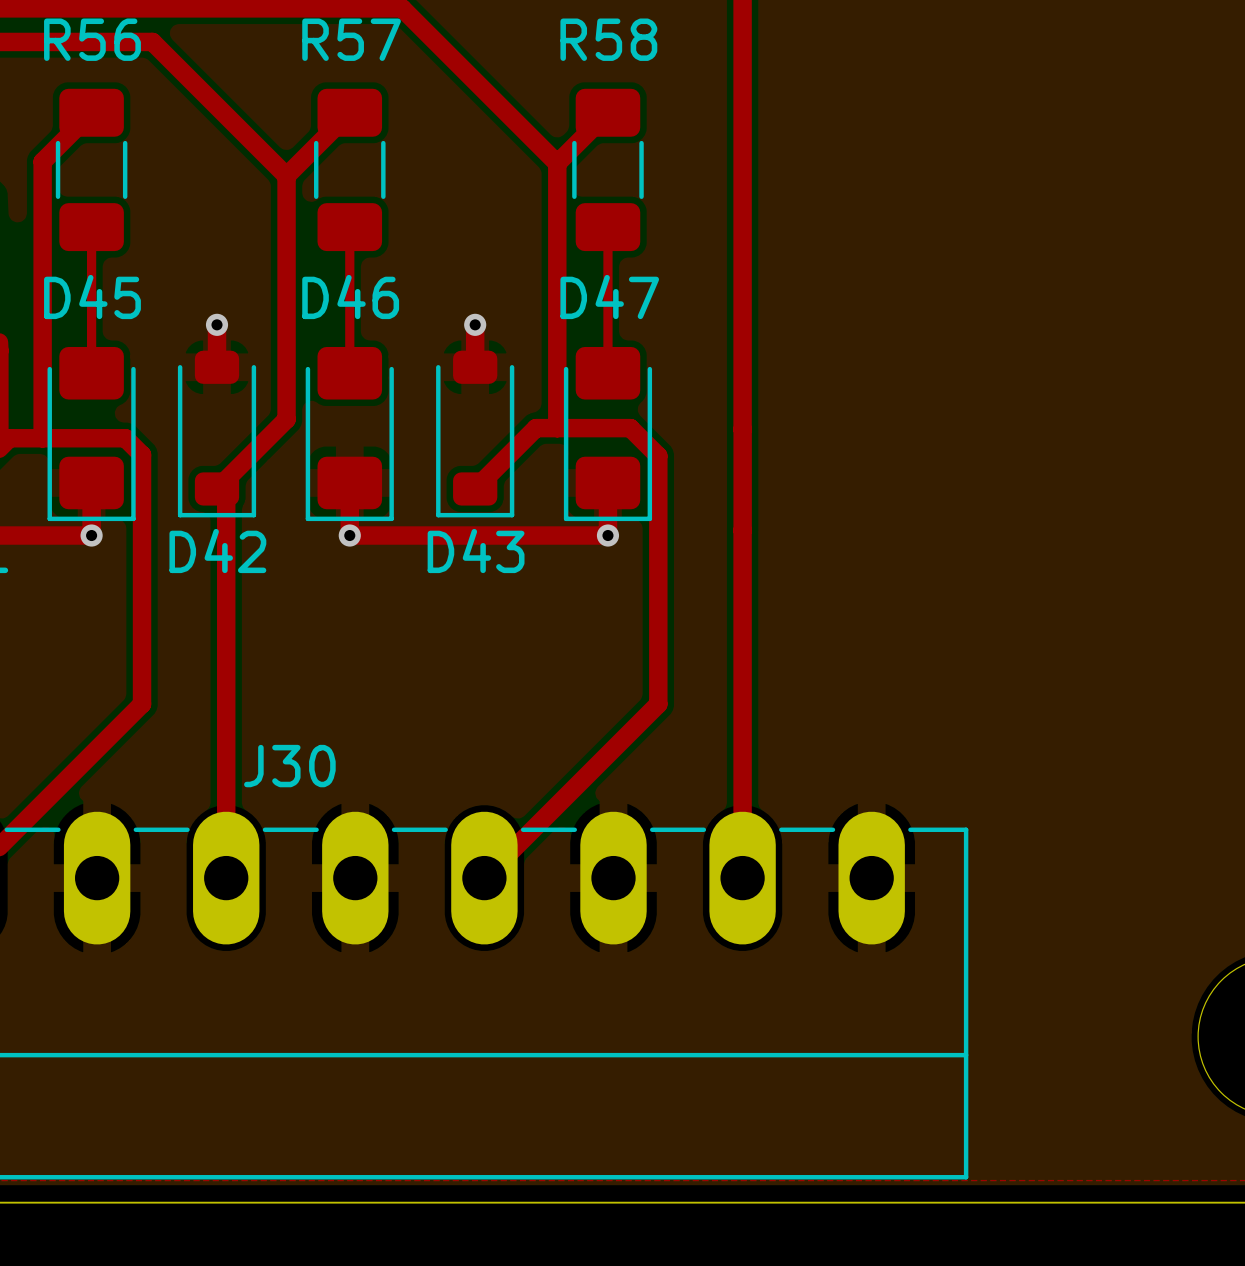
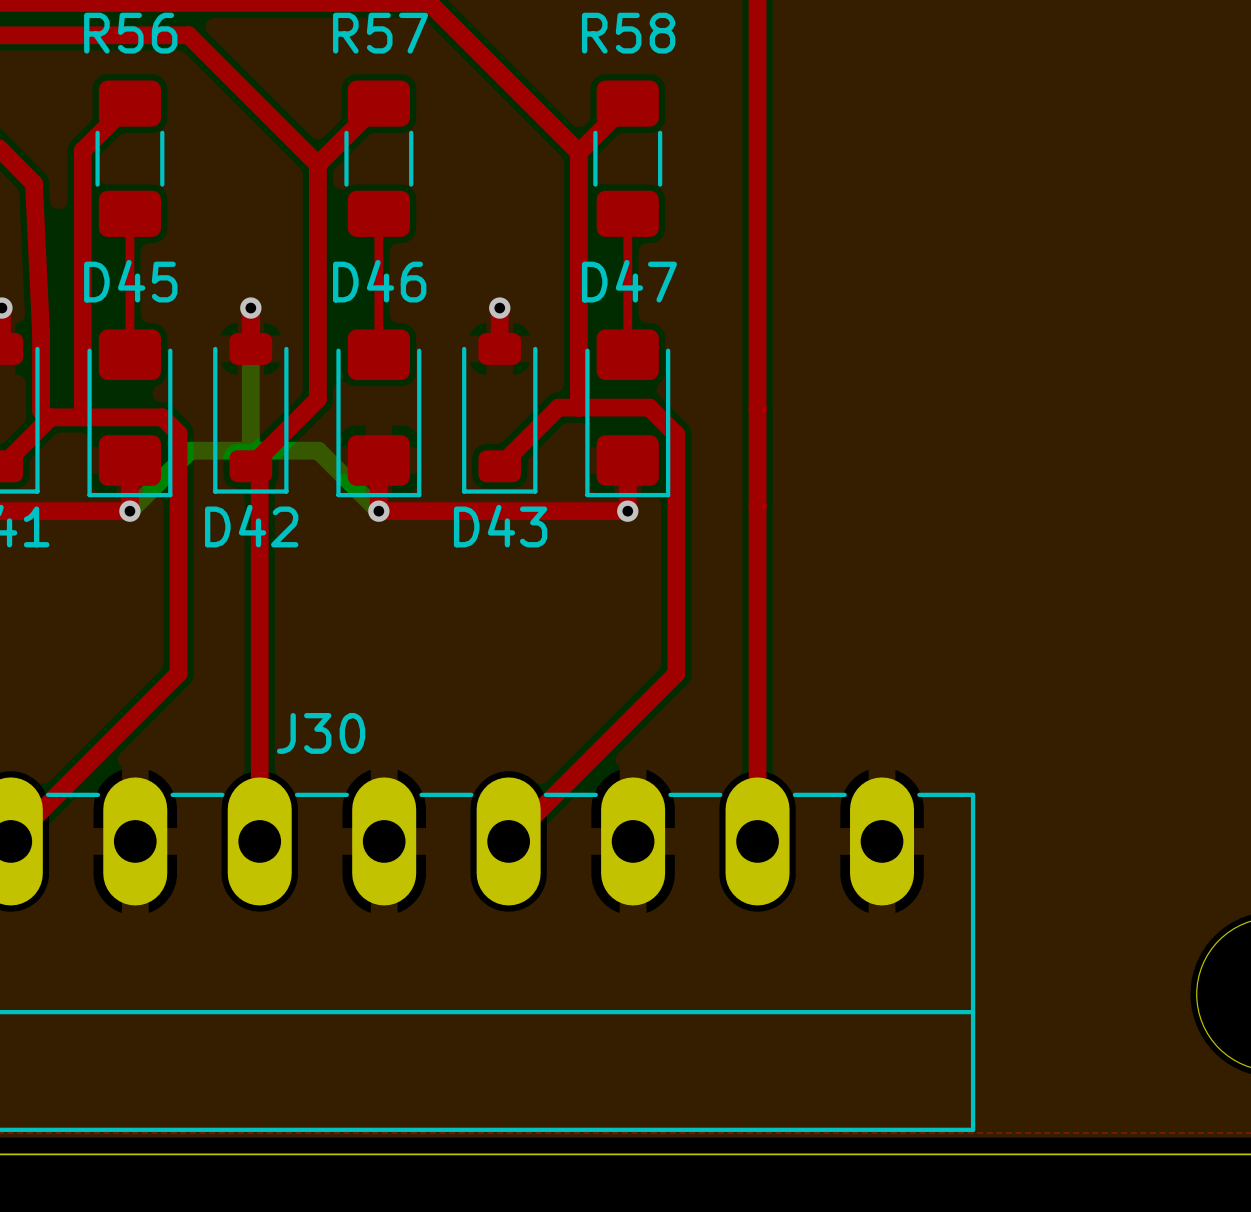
bottom track: none -> (250, 308) (250, 450)
bottom track: none -> (129, 511) (190, 450) (318, 450) (378, 511)

